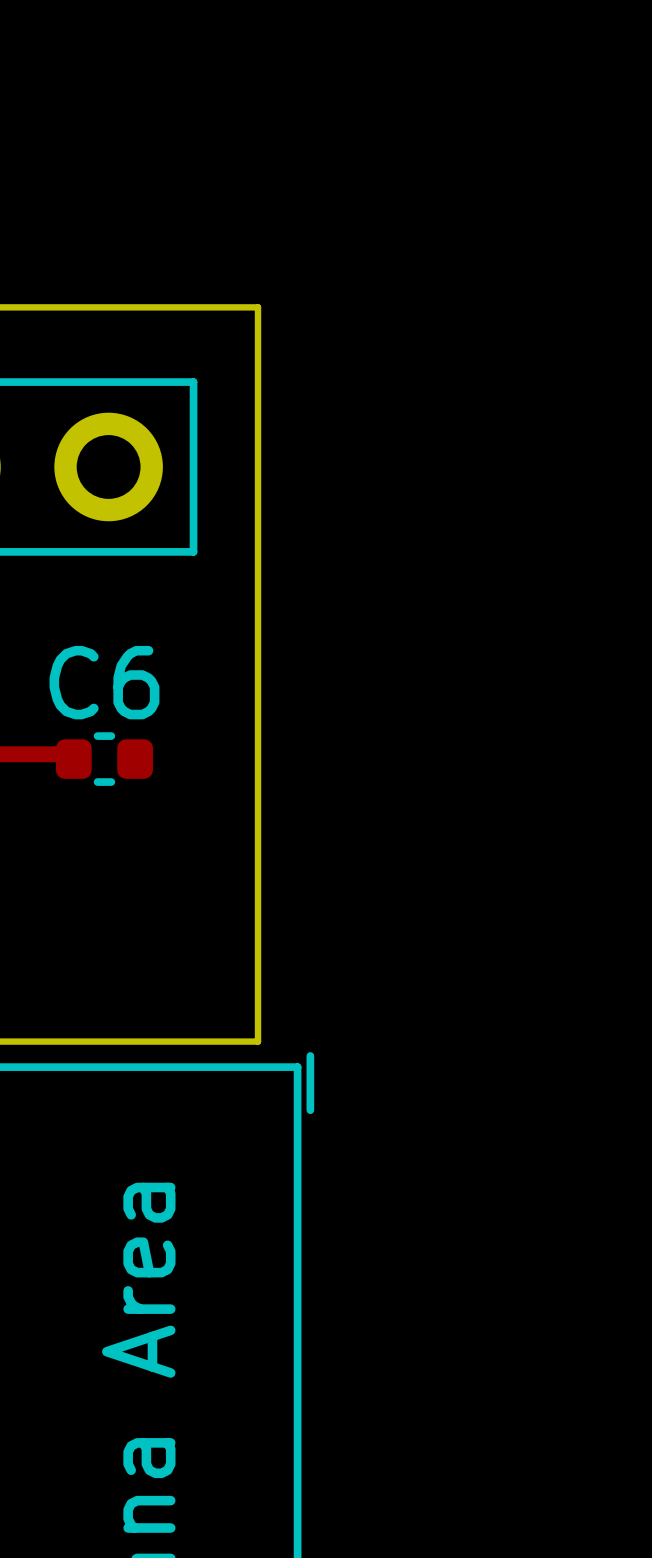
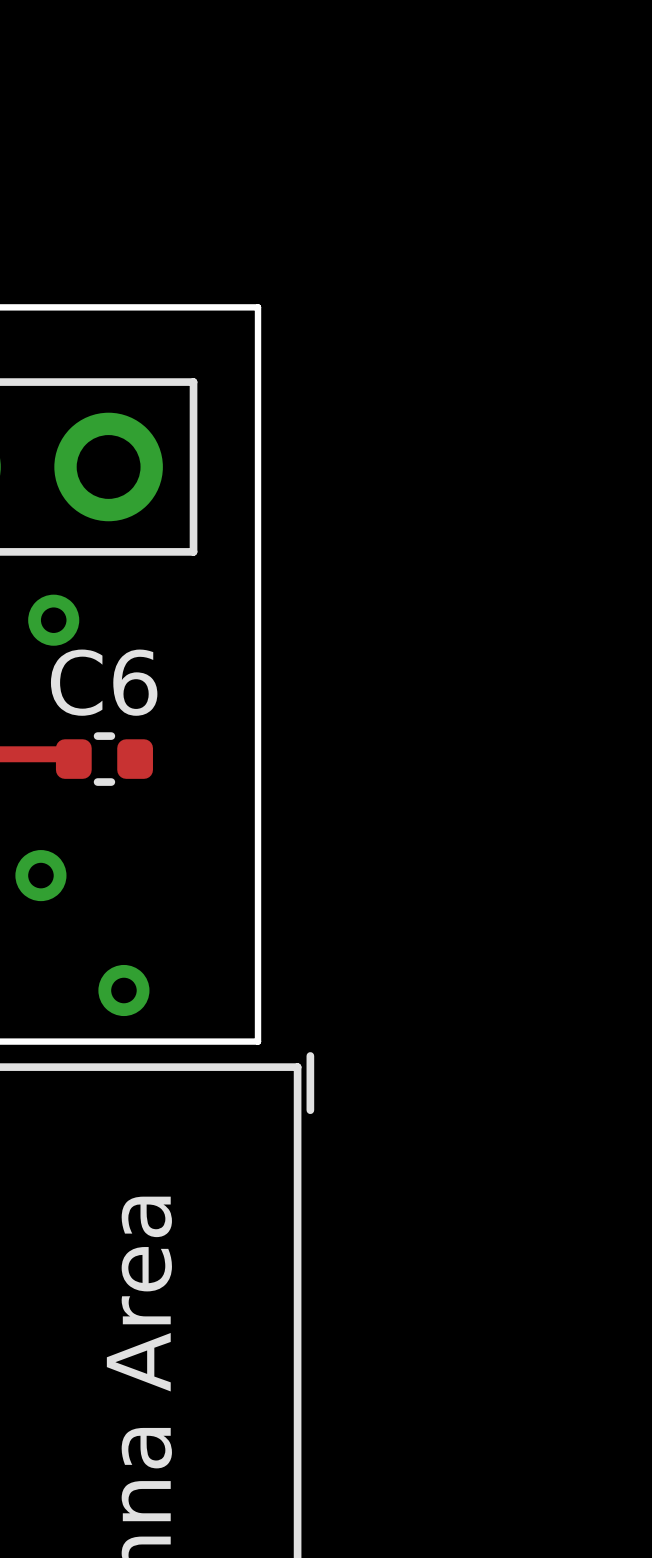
via: none -> (53, 620)
via: none -> (40, 875)
via: none -> (123, 990)

